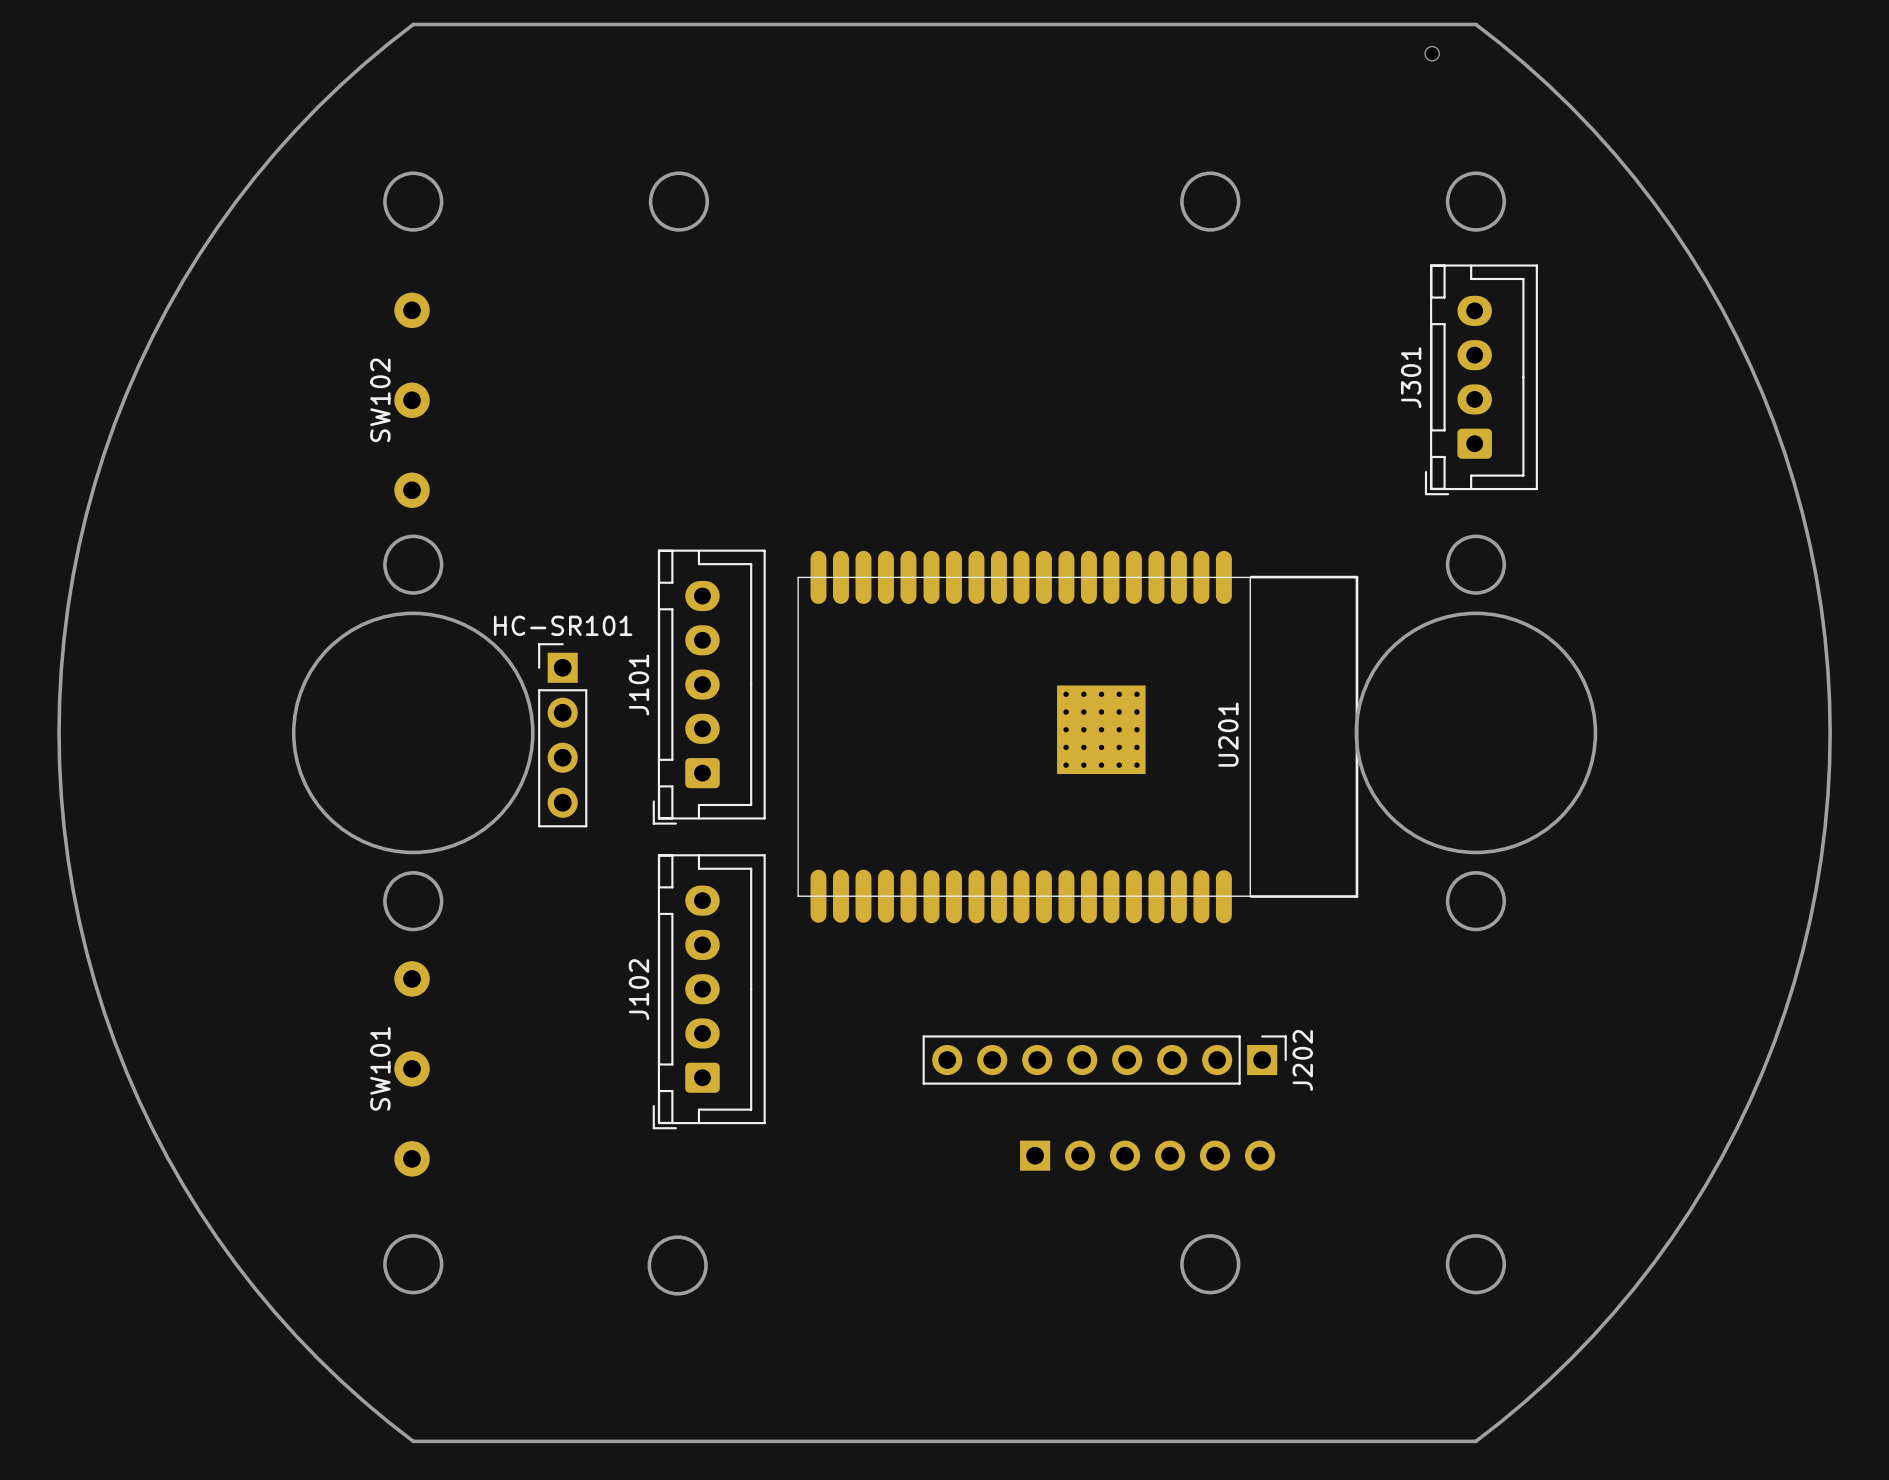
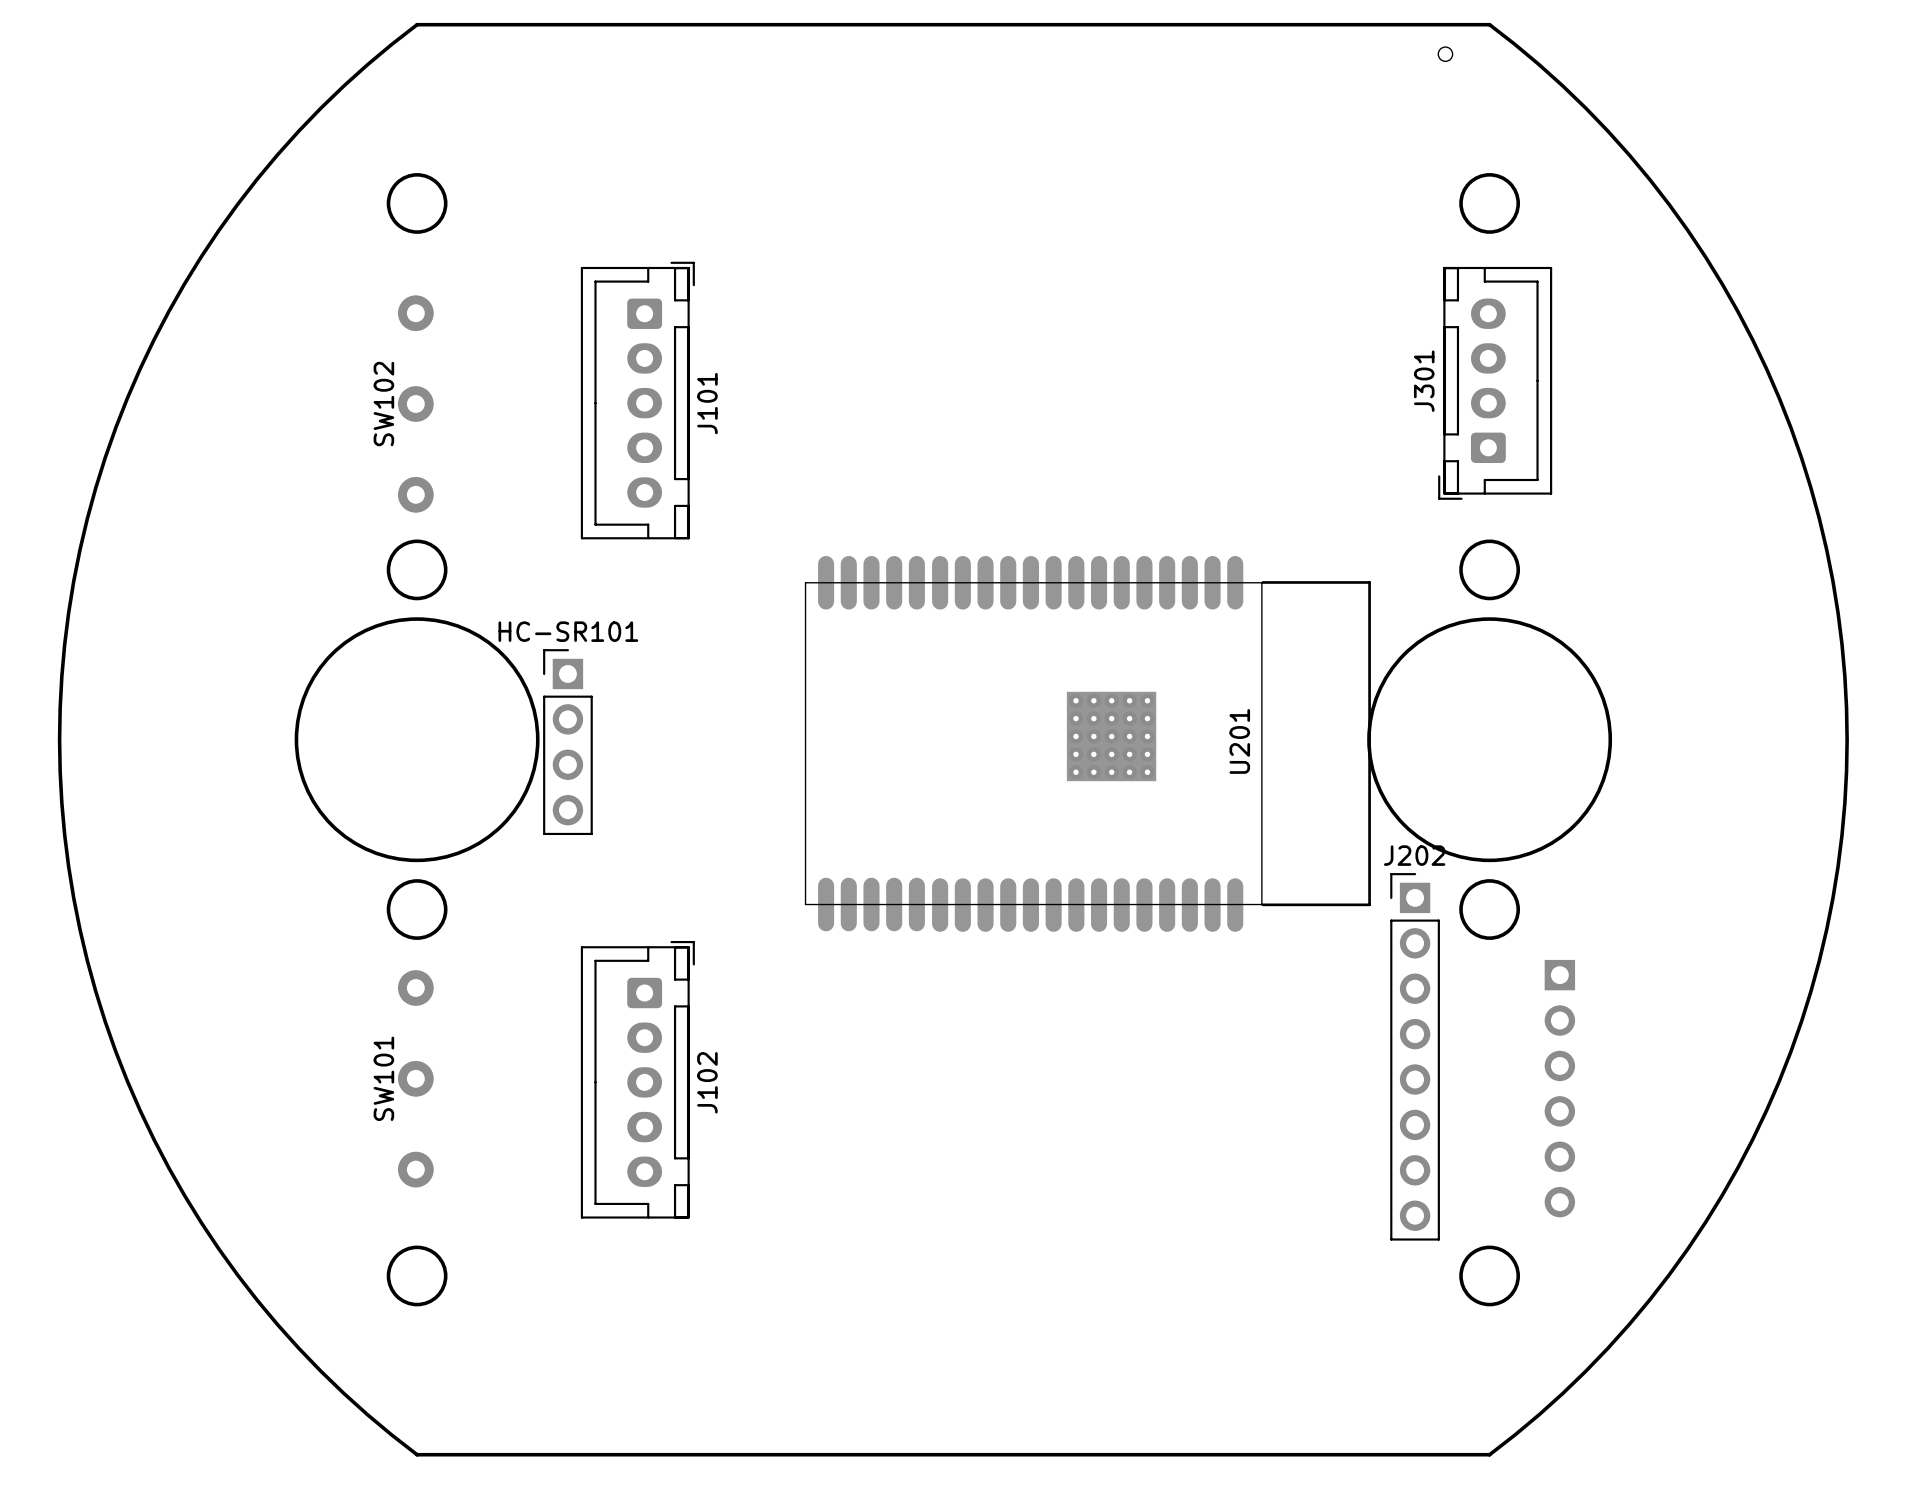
round board edge: [648, 171, 710, 232] -> none
round board edge: [1180, 171, 1241, 232] -> none
J101 rotation: 0° (709, 687) -> 180° (637, 400)
J101 position: (709, 687) -> (637, 400)
J102 rotation: 0° (709, 991) -> 180° (637, 1079)
J202 rotation: 0° (1104, 1060) -> 90° counterclockwise (1415, 1056)
J202 position: (1104, 1060) -> (1415, 1056)
part rotation: 0° (1147, 1155) -> 90° clockwise (1559, 1088)
part position: (1147, 1155) -> (1559, 1088)
round board edge: [1180, 1234, 1241, 1295] -> none
round board edge: [647, 1235, 708, 1296] -> none

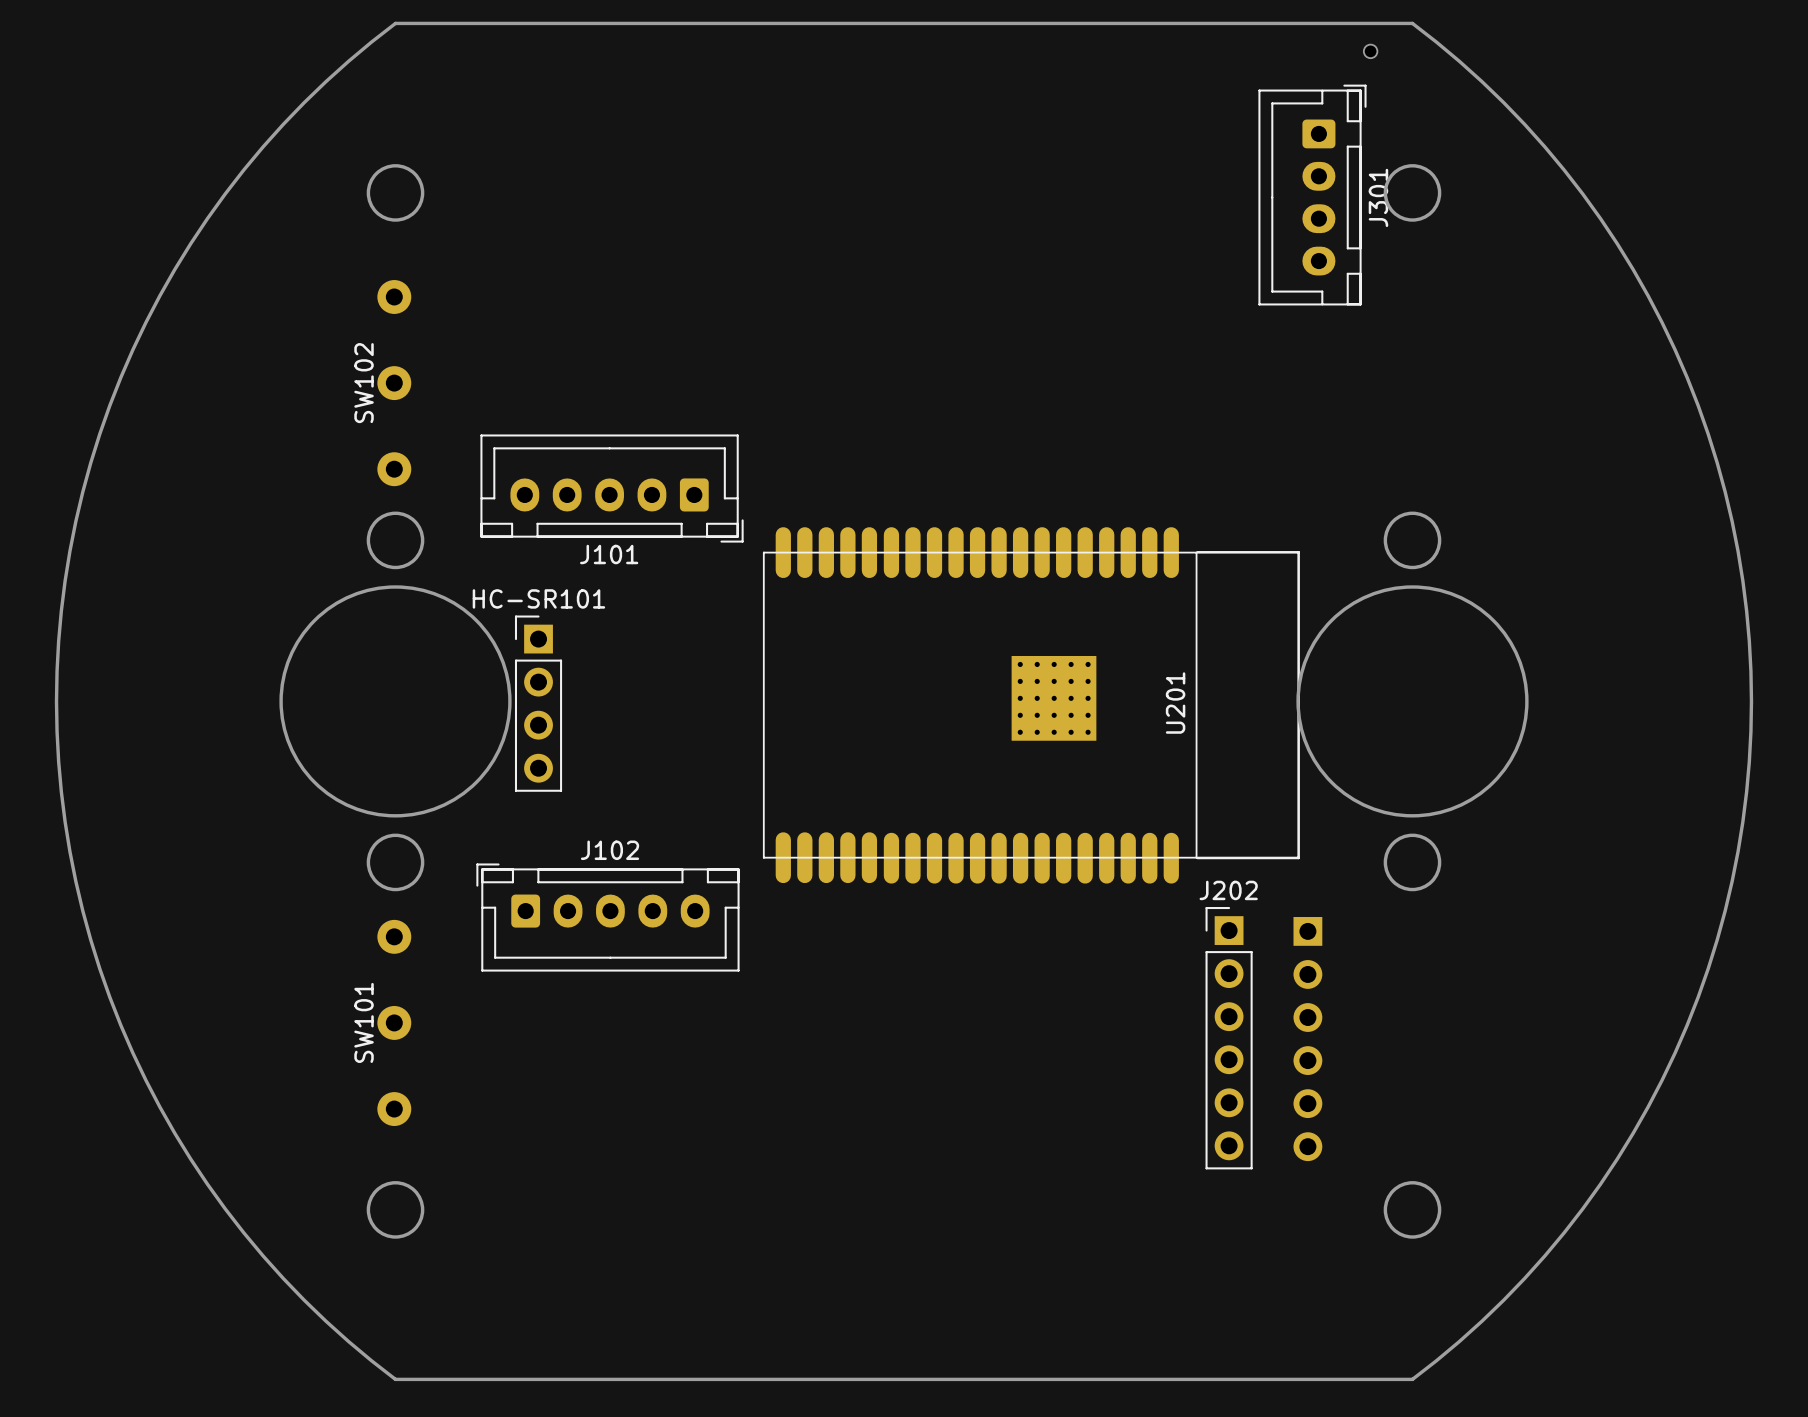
J301 rotation: 0° (1495, 383) -> 180° (1312, 195)
J301 position: (1495, 383) -> (1312, 195)
J101 rotation: 0° (637, 400) -> 90° clockwise (612, 488)
J202 name position: J202 (1414, 855) -> J202 (1228, 890)
J202 footprint: [1390, 873, 1440, 1241] -> [1205, 907, 1253, 1170]
J102 rotation: 0° (637, 1079) -> 90° counterclockwise (607, 917)
part position: (1559, 1088) -> (1307, 1039)

